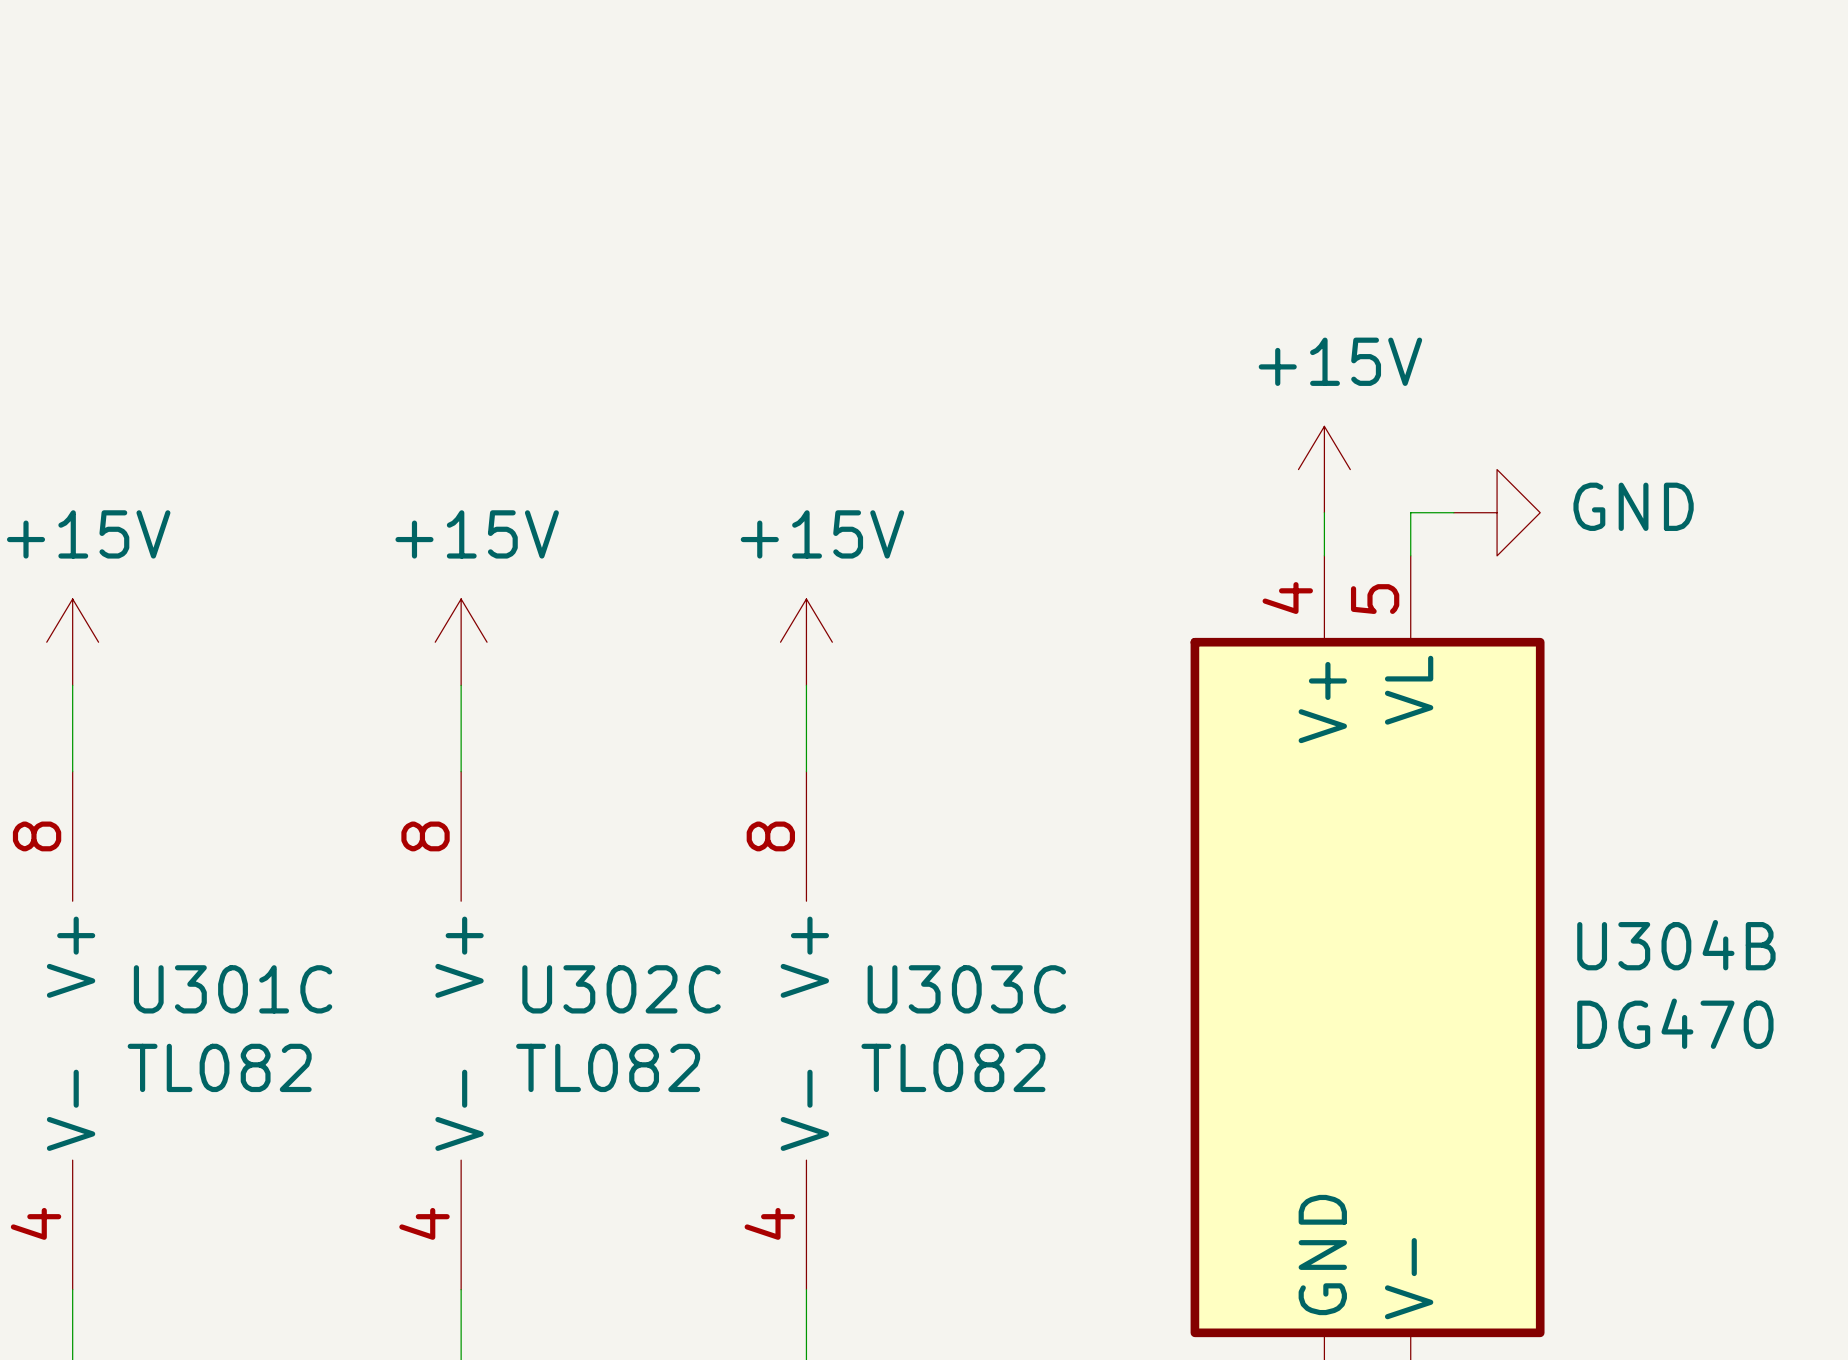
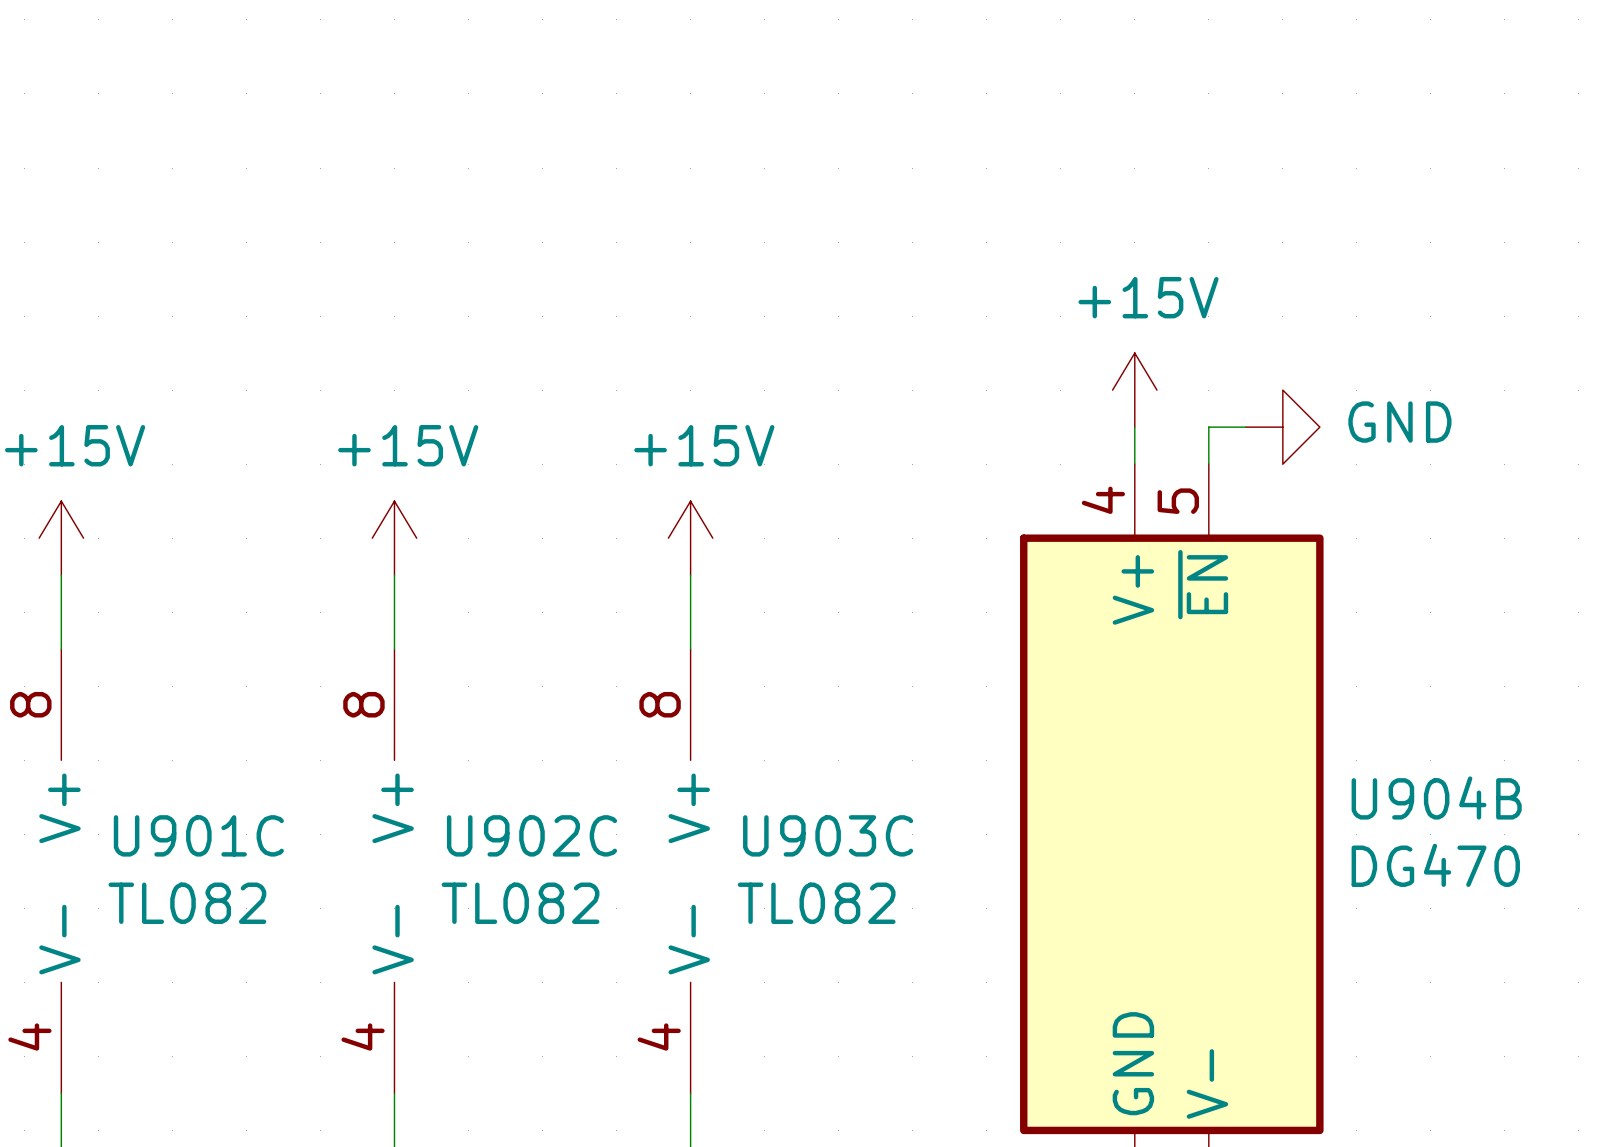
U304B pin name: VL (1409, 690) -> ~{EN} (1203, 584)
U304B name: U304B (1676, 945) -> U904B (1436, 797)
U301C name: U301C (233, 989) -> U901C (198, 835)
U302C name: U302C (621, 989) -> U902C (531, 835)
U303C name: U303C (966, 989) -> U903C (828, 835)

